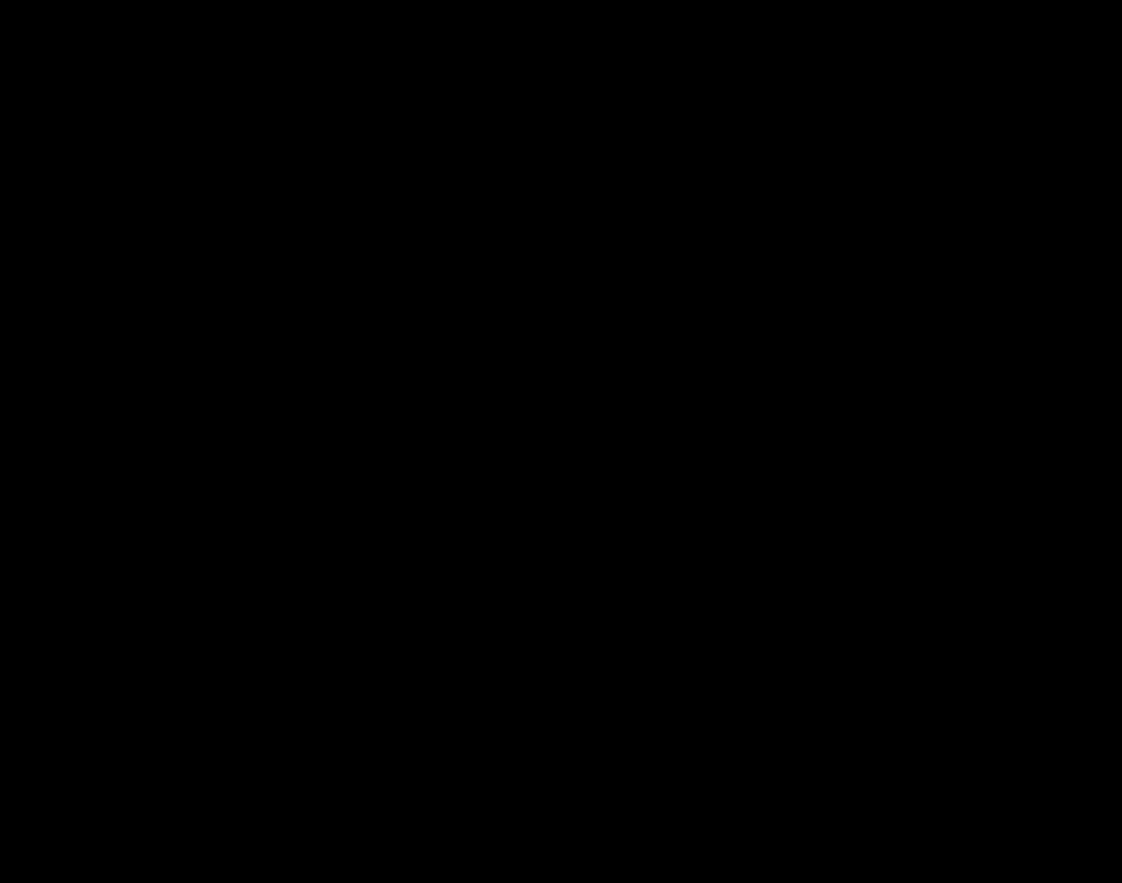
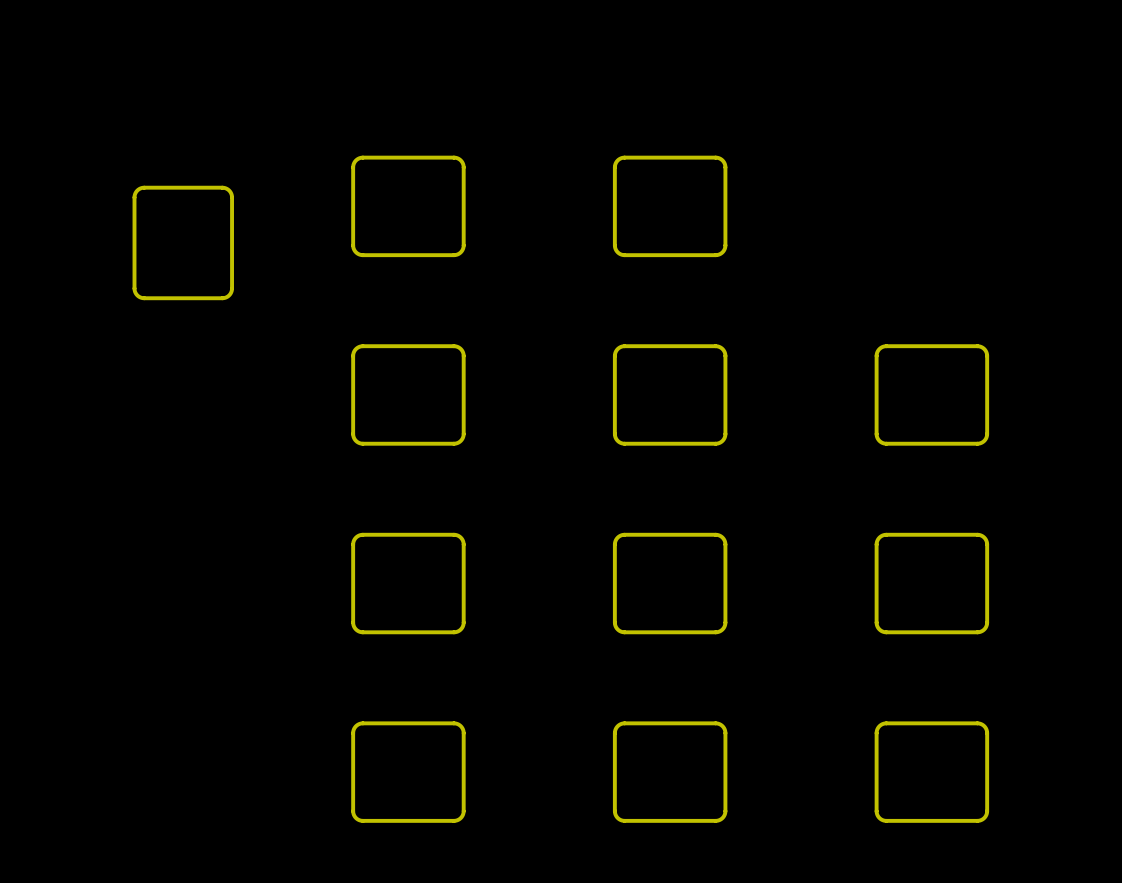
part: none -> (408, 206)
part: none -> (670, 206)
part: none -> (183, 242)
part: none -> (408, 394)
part: none -> (670, 394)
part: none -> (931, 394)
part: none -> (408, 583)
part: none -> (670, 583)
part: none -> (931, 583)
part: none -> (408, 772)
part: none -> (670, 772)
part: none -> (931, 772)

